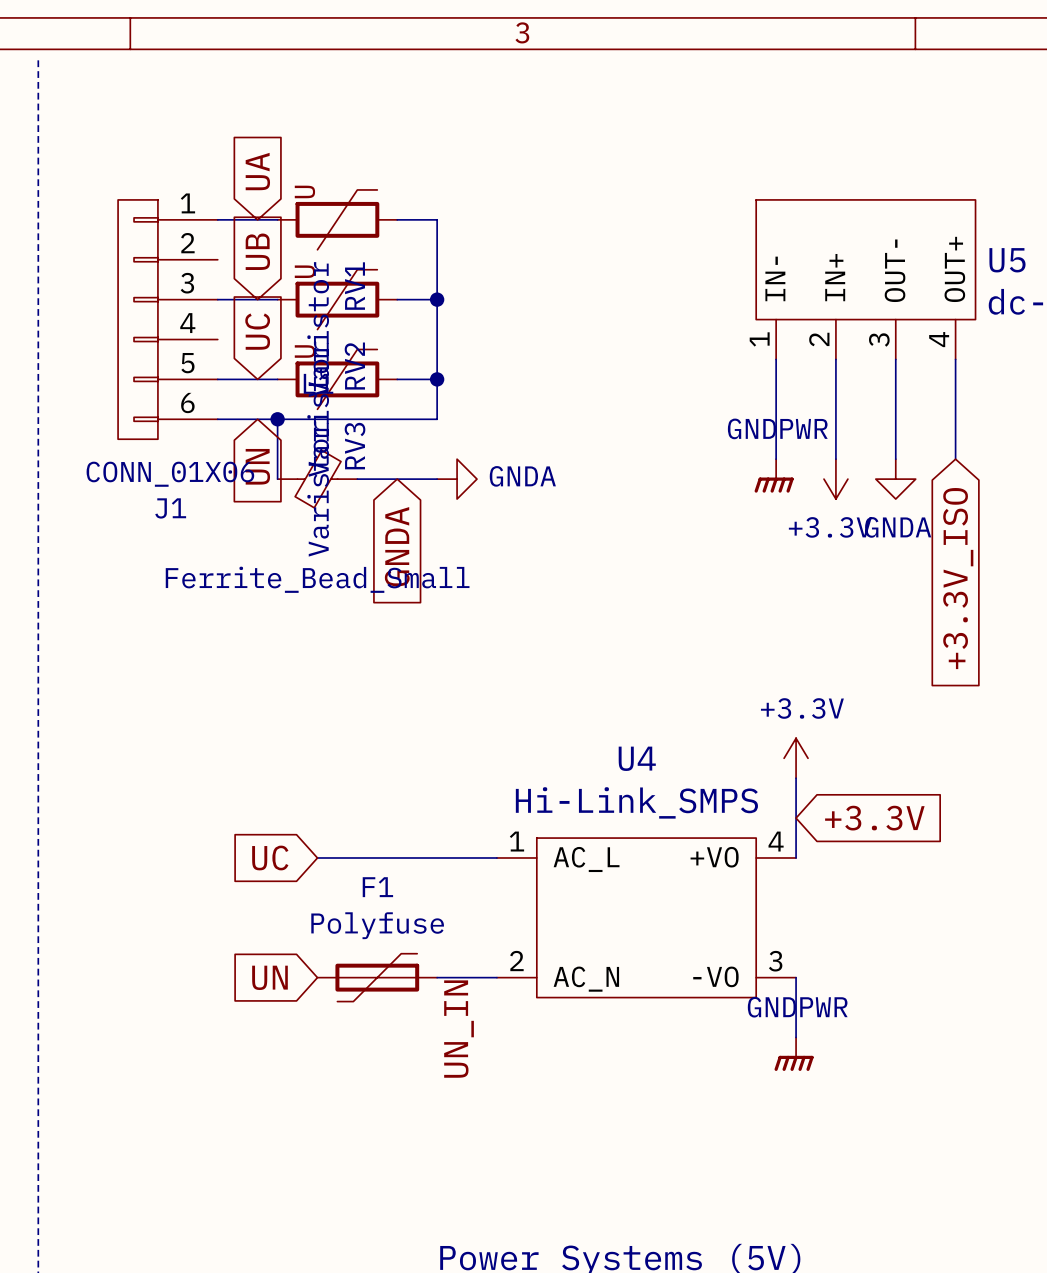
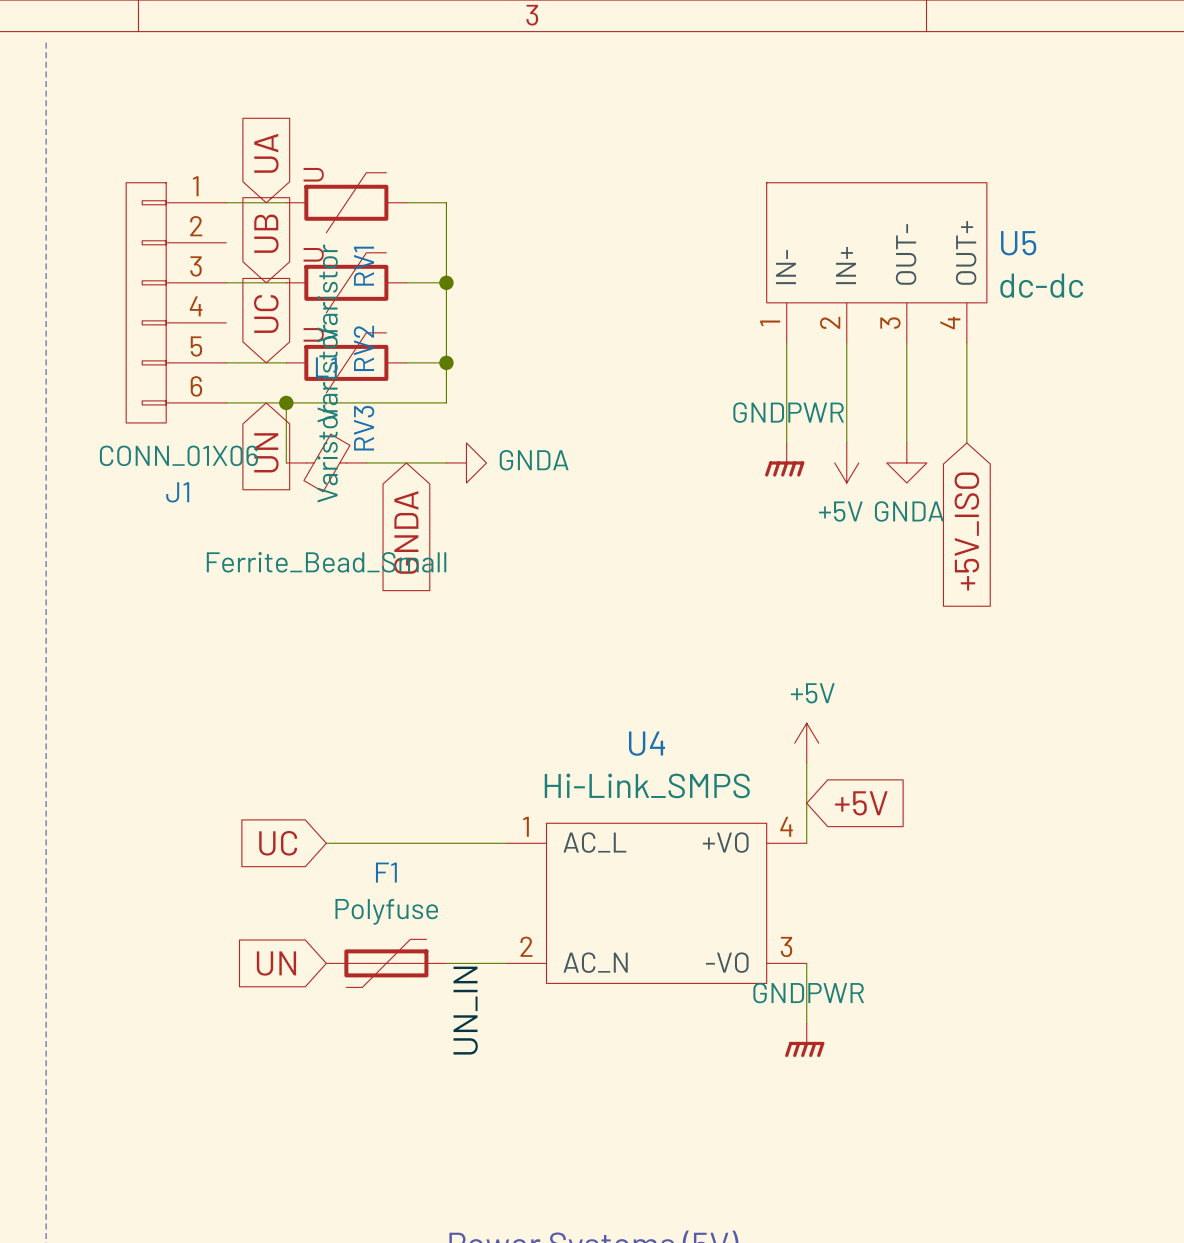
power symbol: +3.3V (835, 479) -> +5V (846, 462)
global label: +3.3V_ISO (958, 578) -> +5V_ISO (966, 531)
power symbol: +3.3V (796, 758) -> +5V (806, 743)
global label: +3.3V (874, 818) -> +5V (861, 803)

